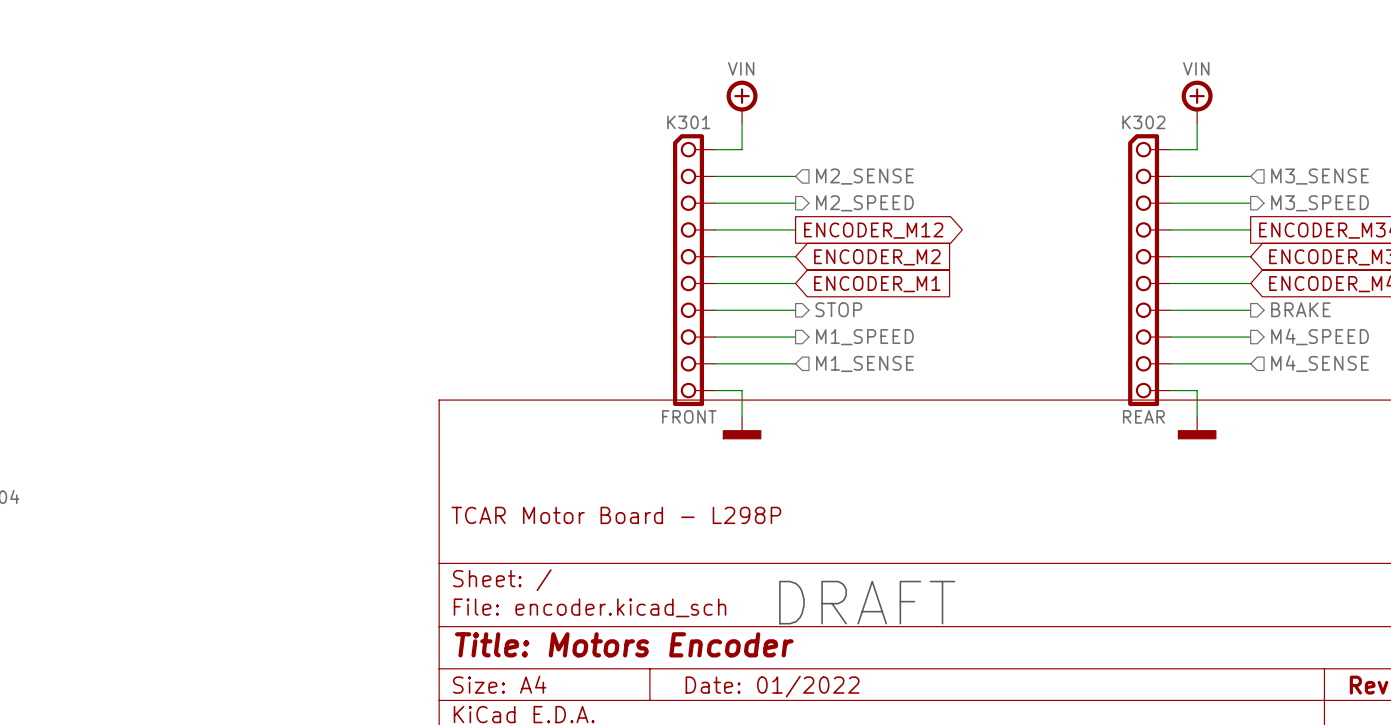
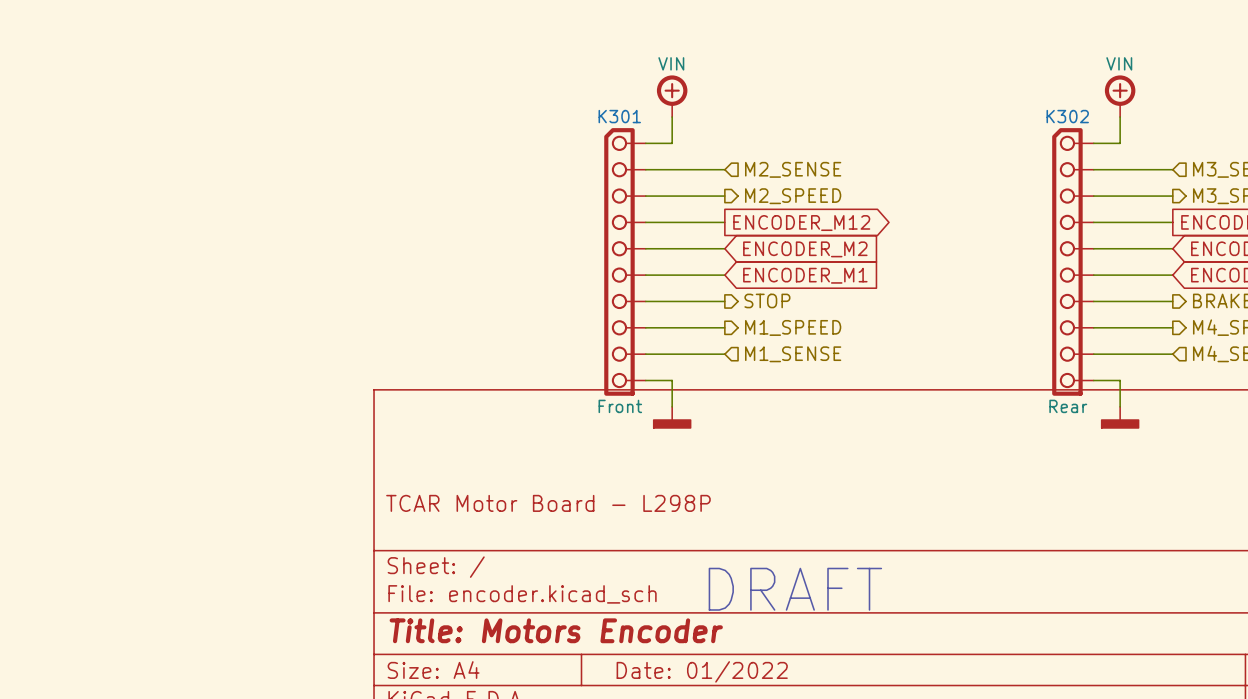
K301 value: FRONT (689, 416) -> Front (620, 406)
K302 value: REAR (1143, 416) -> Rear (1068, 406)

